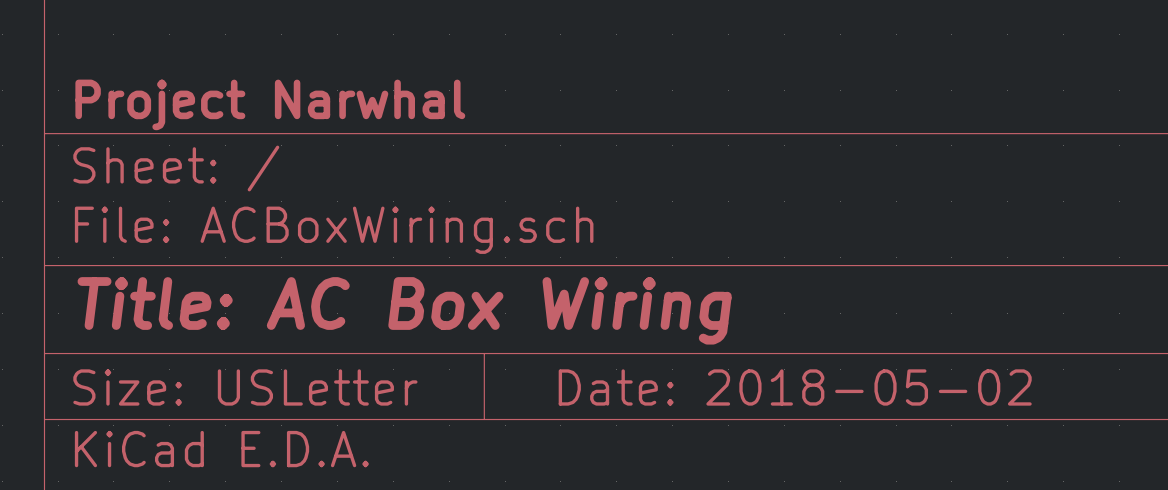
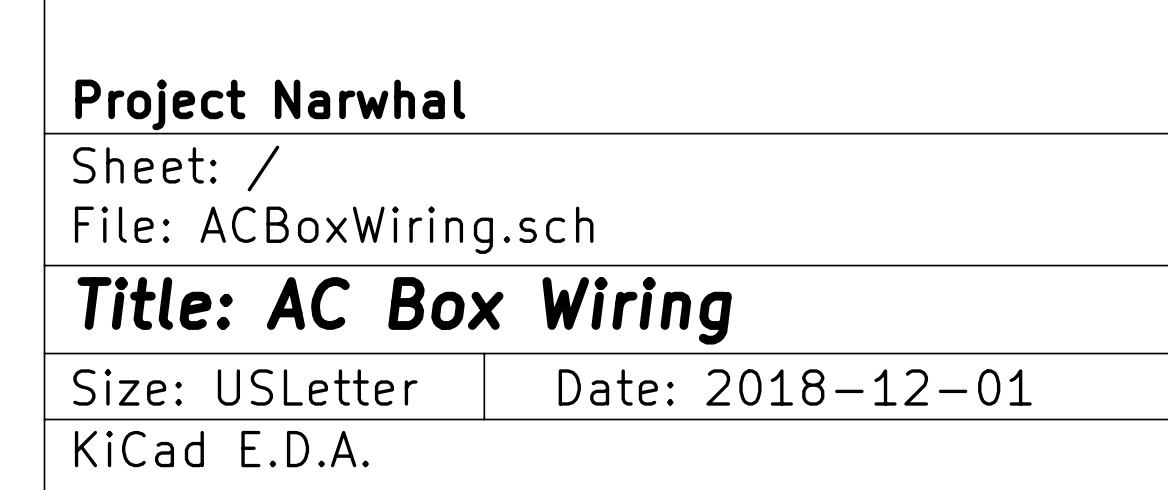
title block: Date: 2018-05-02 (795, 387) -> Date: 2018-12-01 (795, 387)

